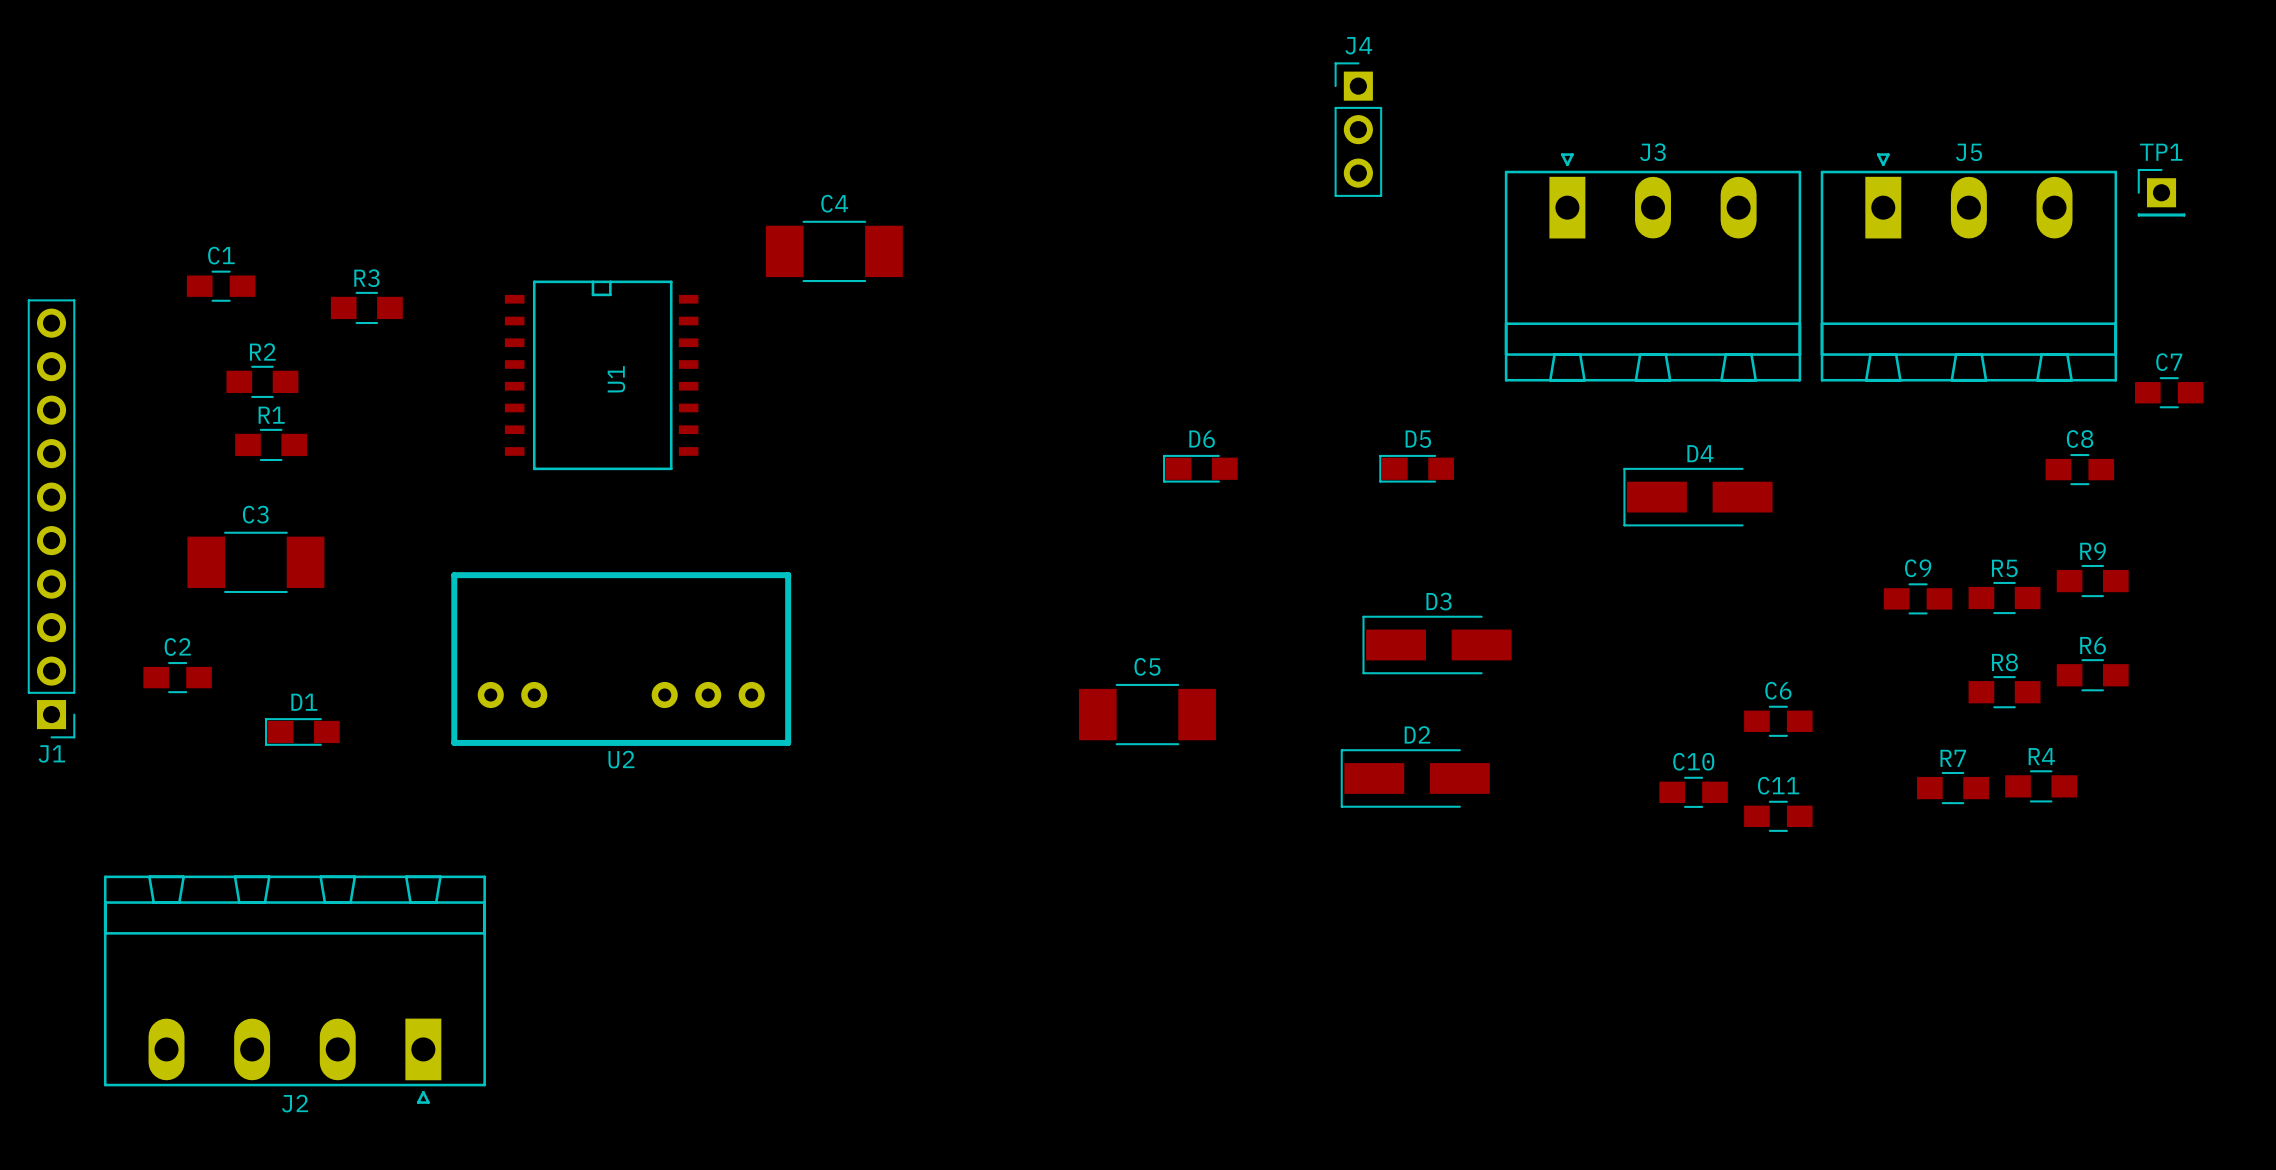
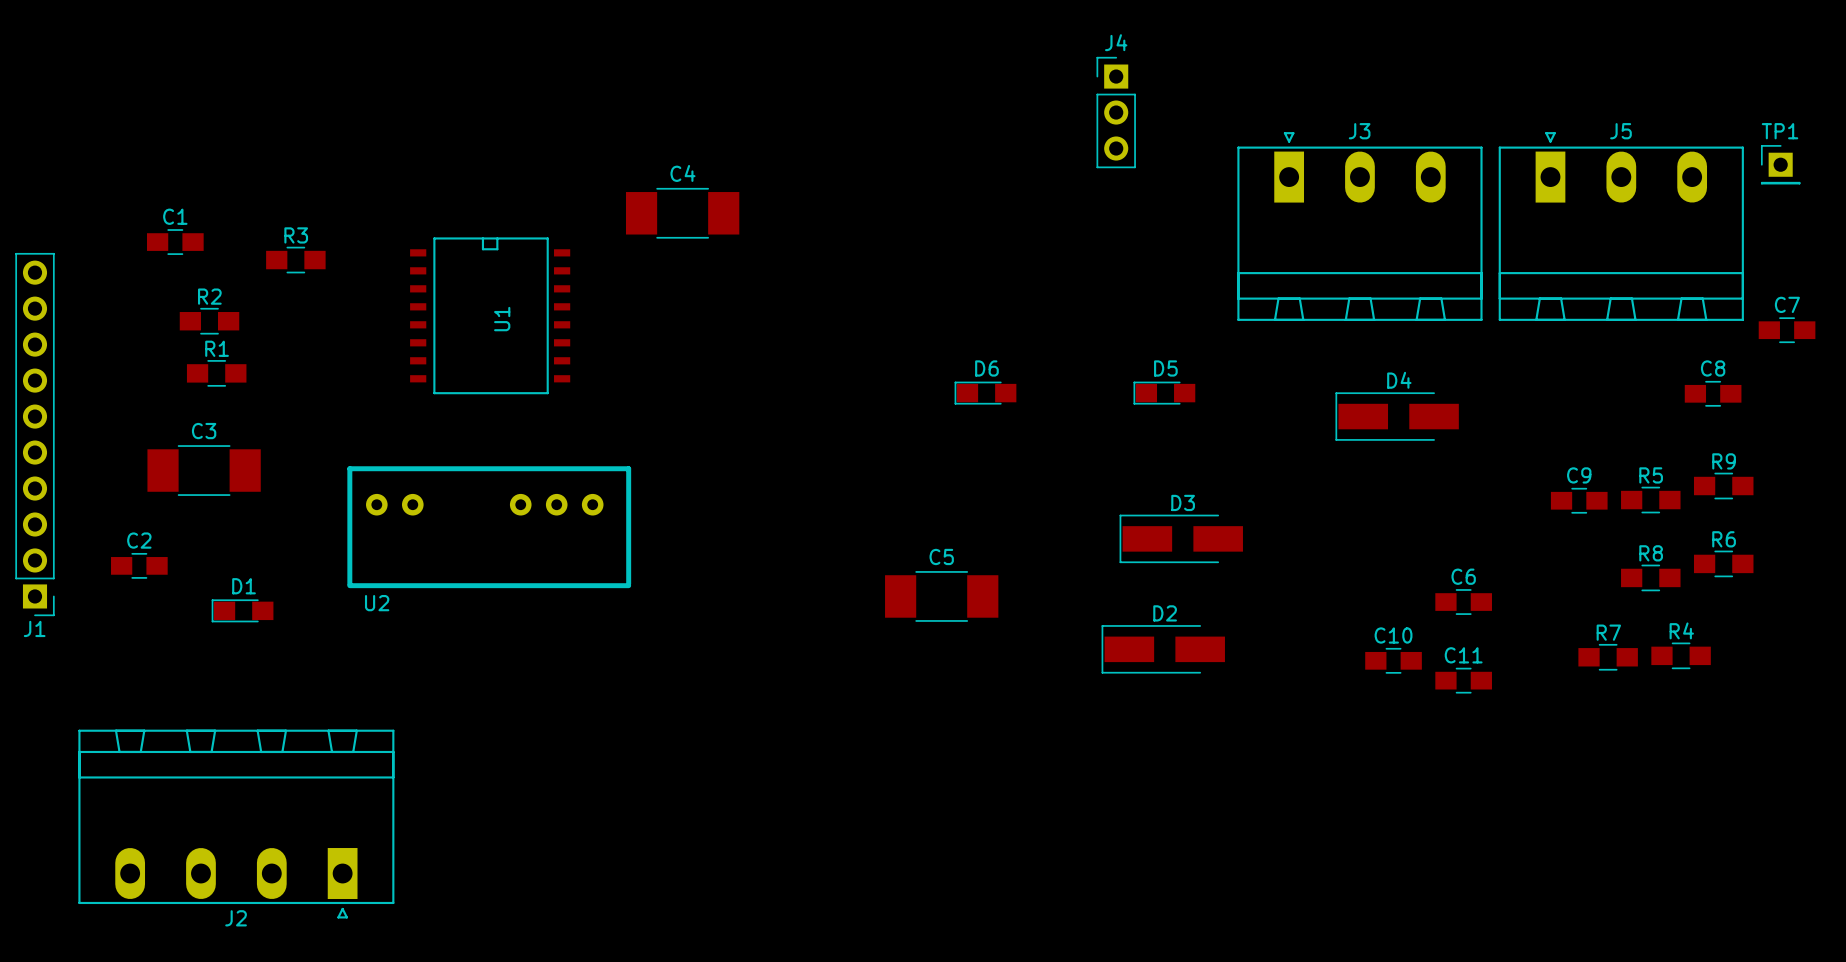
U2 footprint: [451, 572, 792, 746] -> [347, 466, 632, 589]
U2 name position: U2 (621, 759) -> U2 (377, 603)

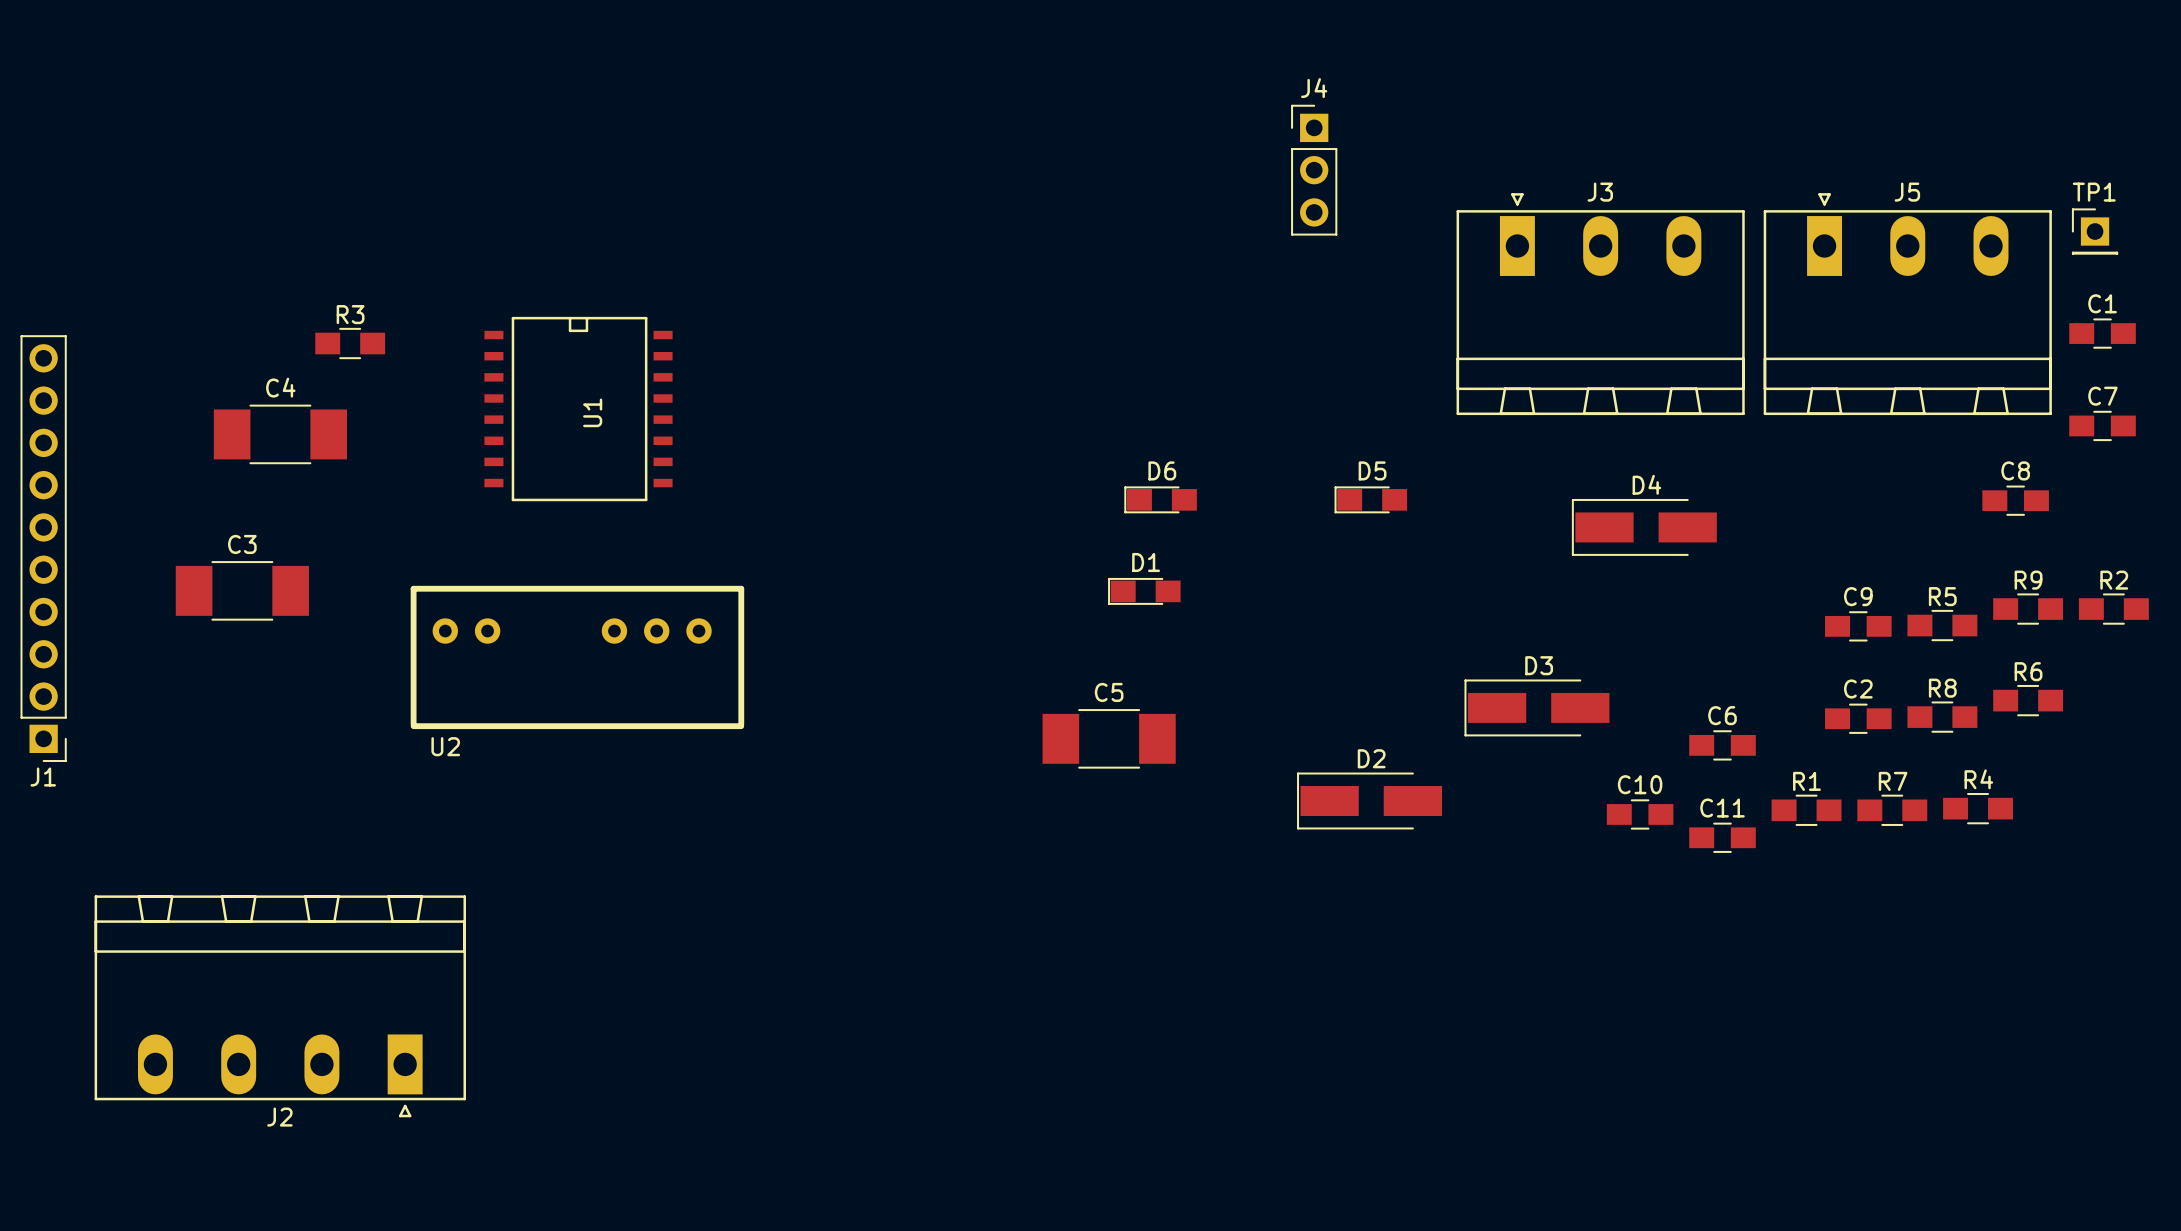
C4 position: (682, 213) -> (280, 434)
C1 position: (175, 242) -> (2102, 333)
R2 position: (209, 321) -> (2113, 609)
R1 position: (216, 373) -> (1806, 810)
D3 position: (1181, 538) -> (1536, 707)
C2 position: (139, 565) -> (1858, 718)
D1 position: (242, 610) -> (1144, 591)

